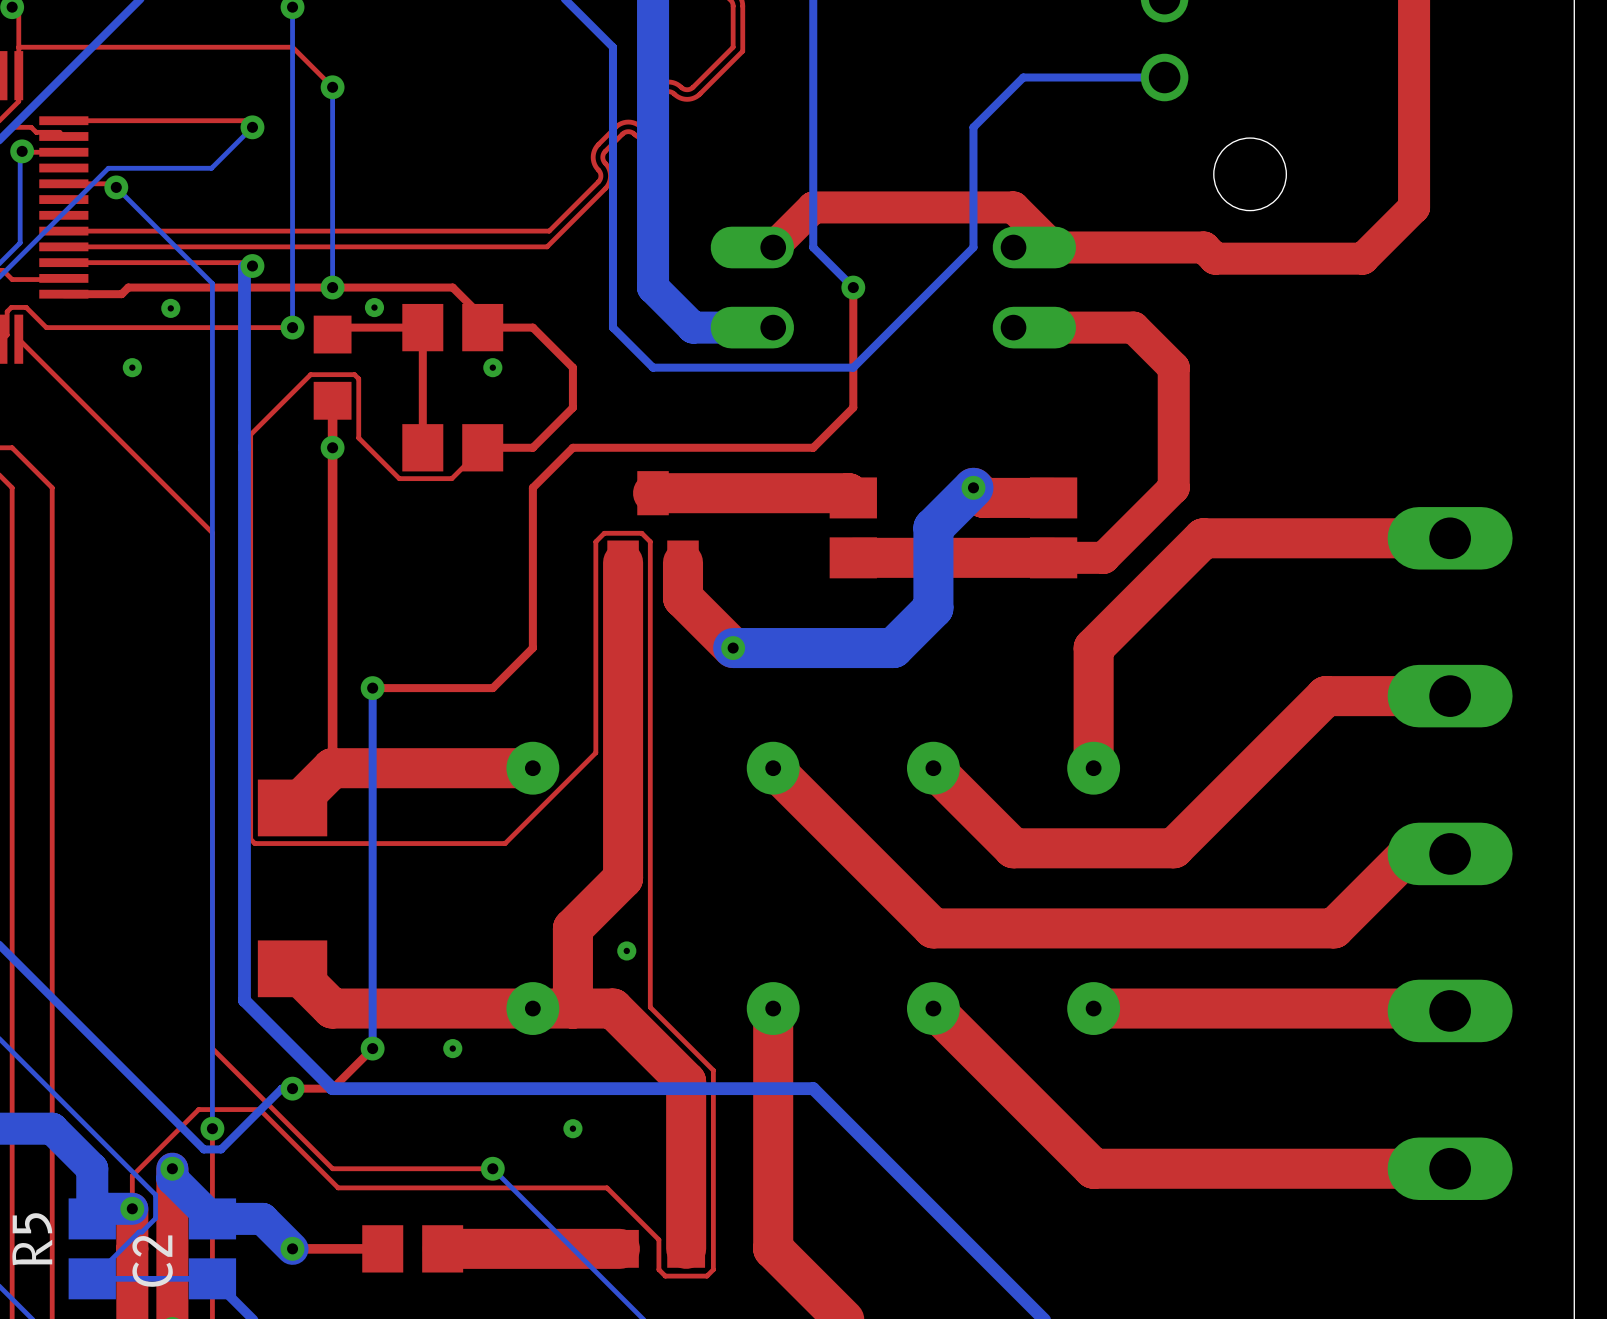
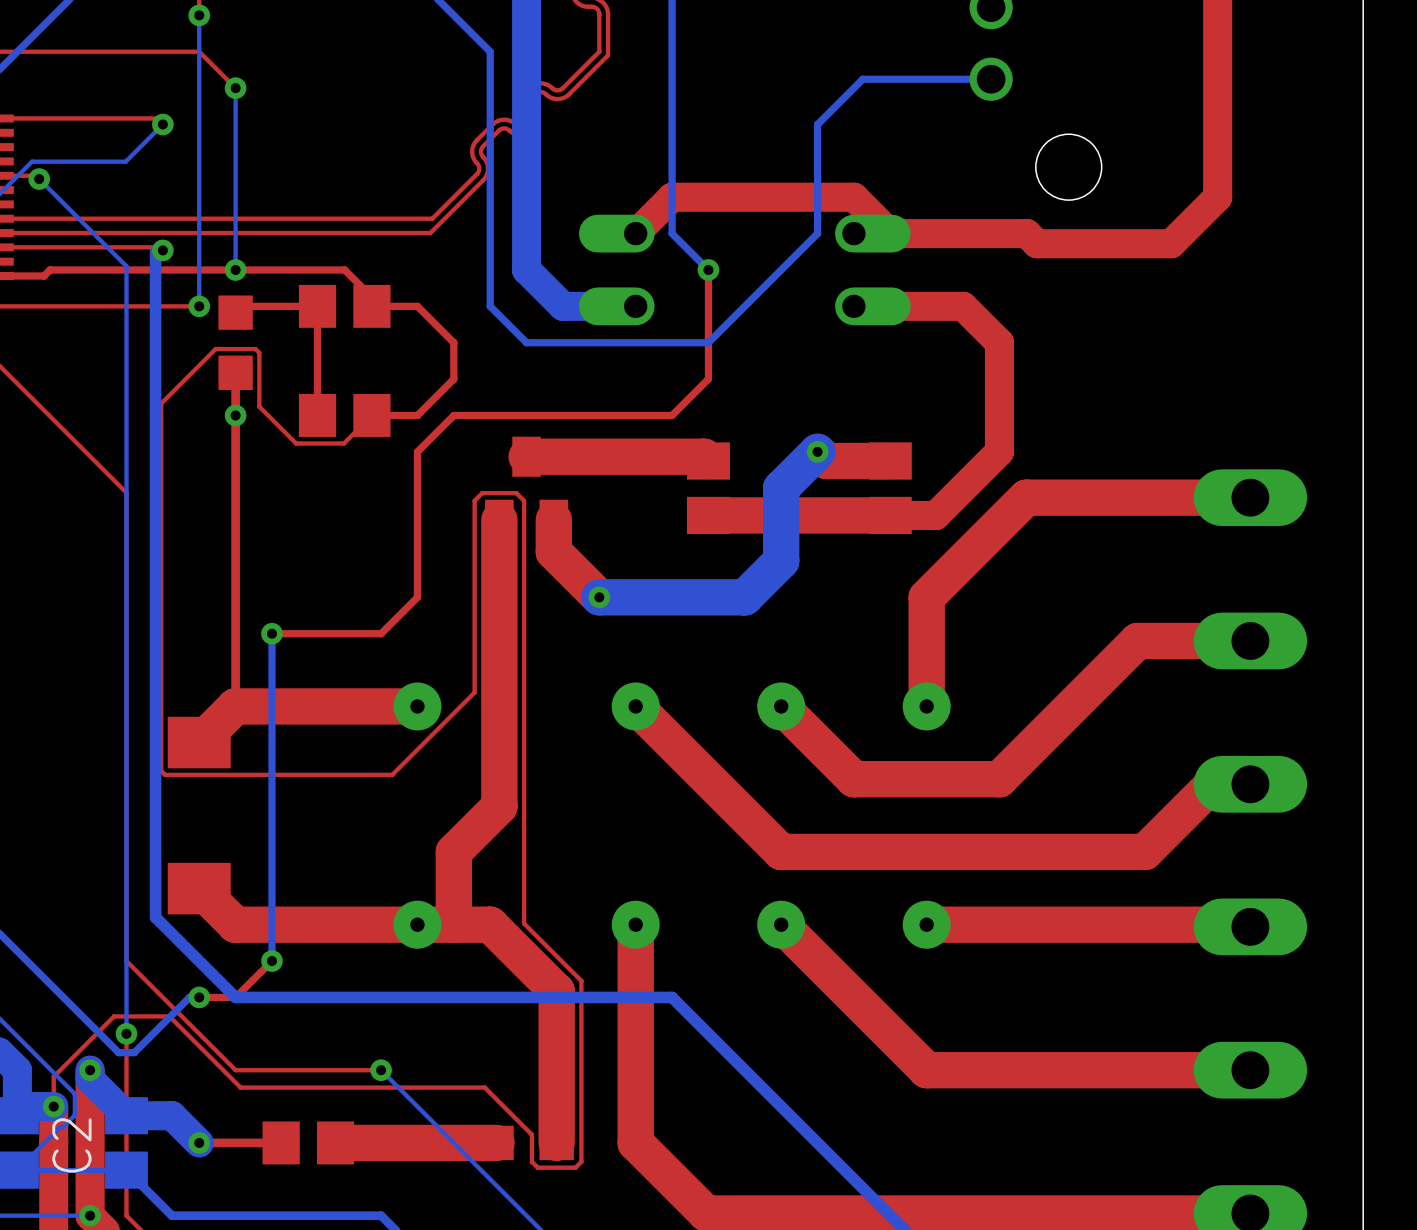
via: (374, 307) -> none
via: (170, 308) -> none
via: (132, 367) -> none
via: (492, 367) -> none
via: (626, 950) -> none
via: (452, 1048) -> none
via: (572, 1128) -> none

